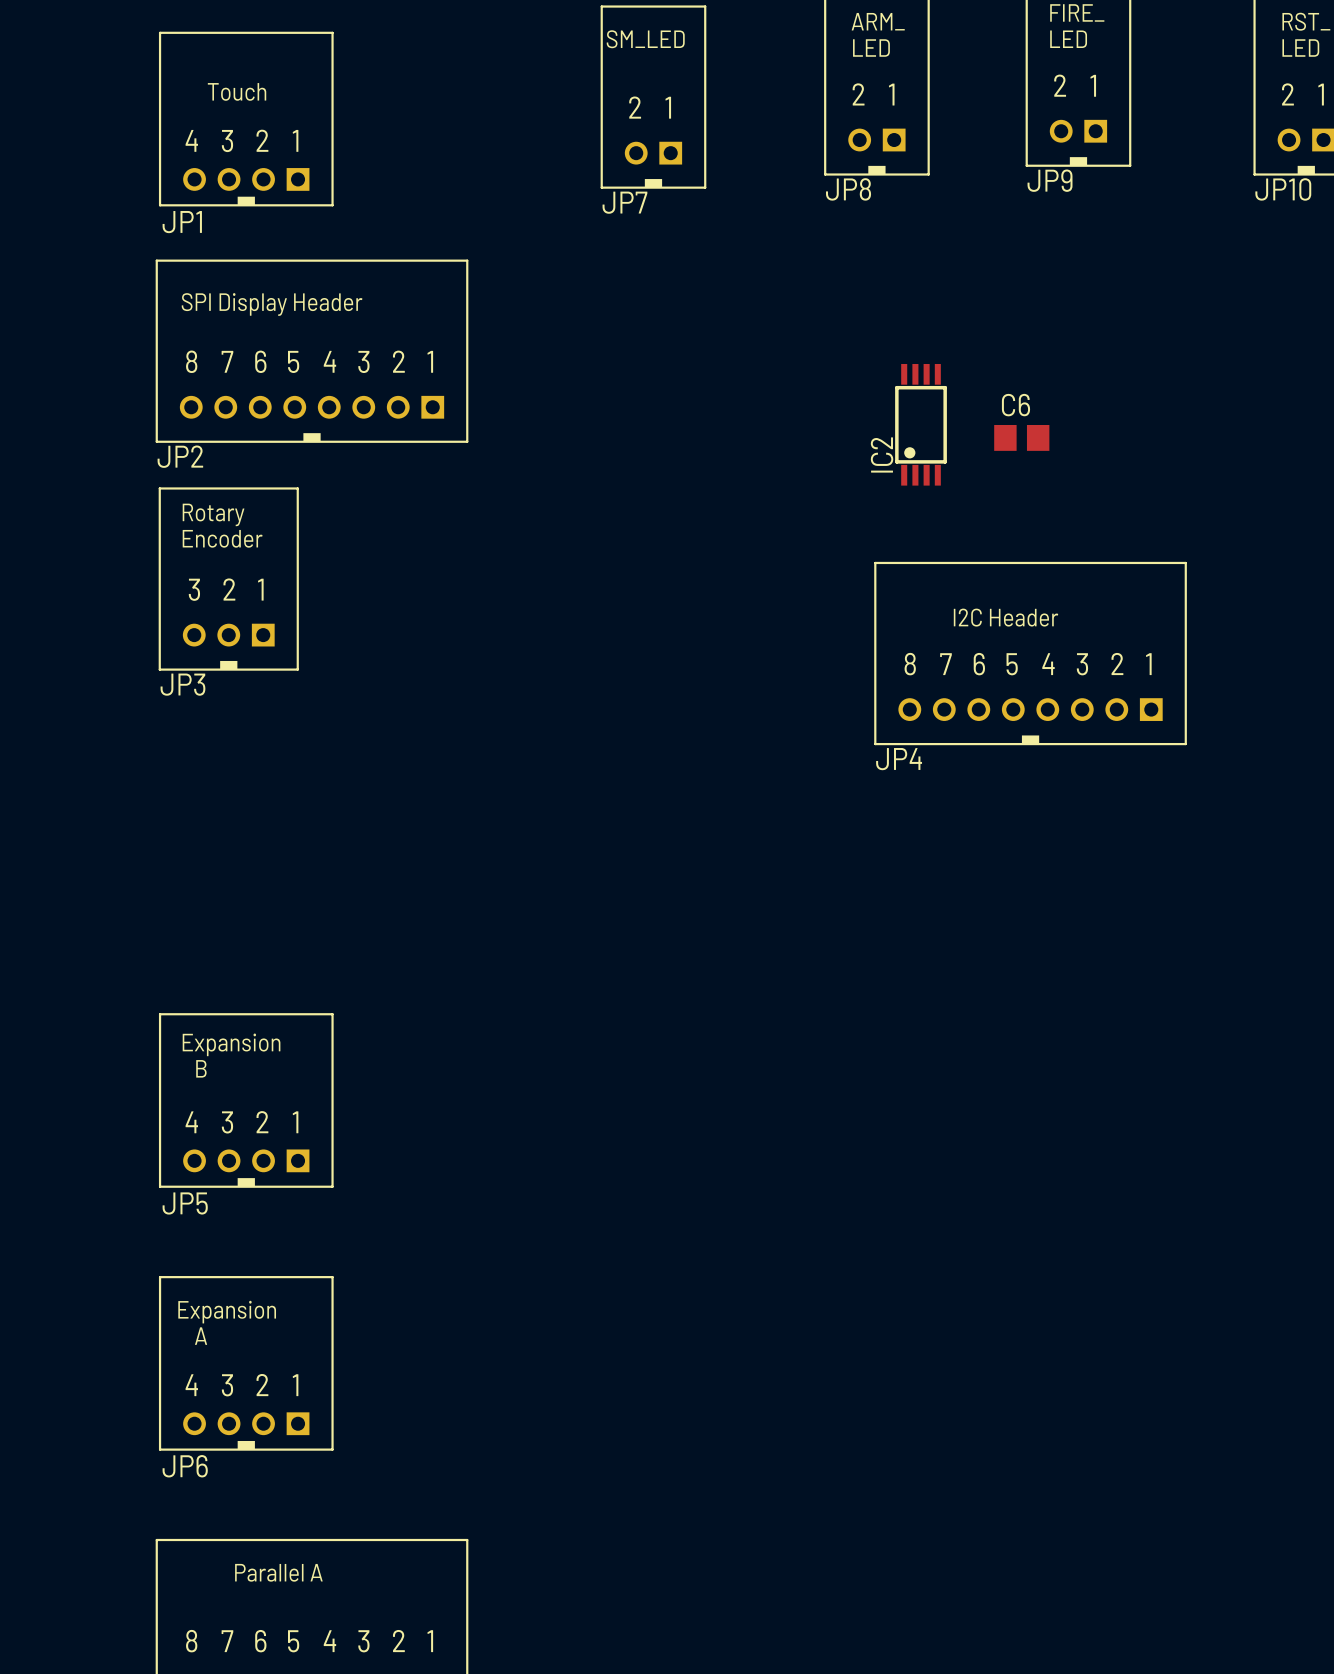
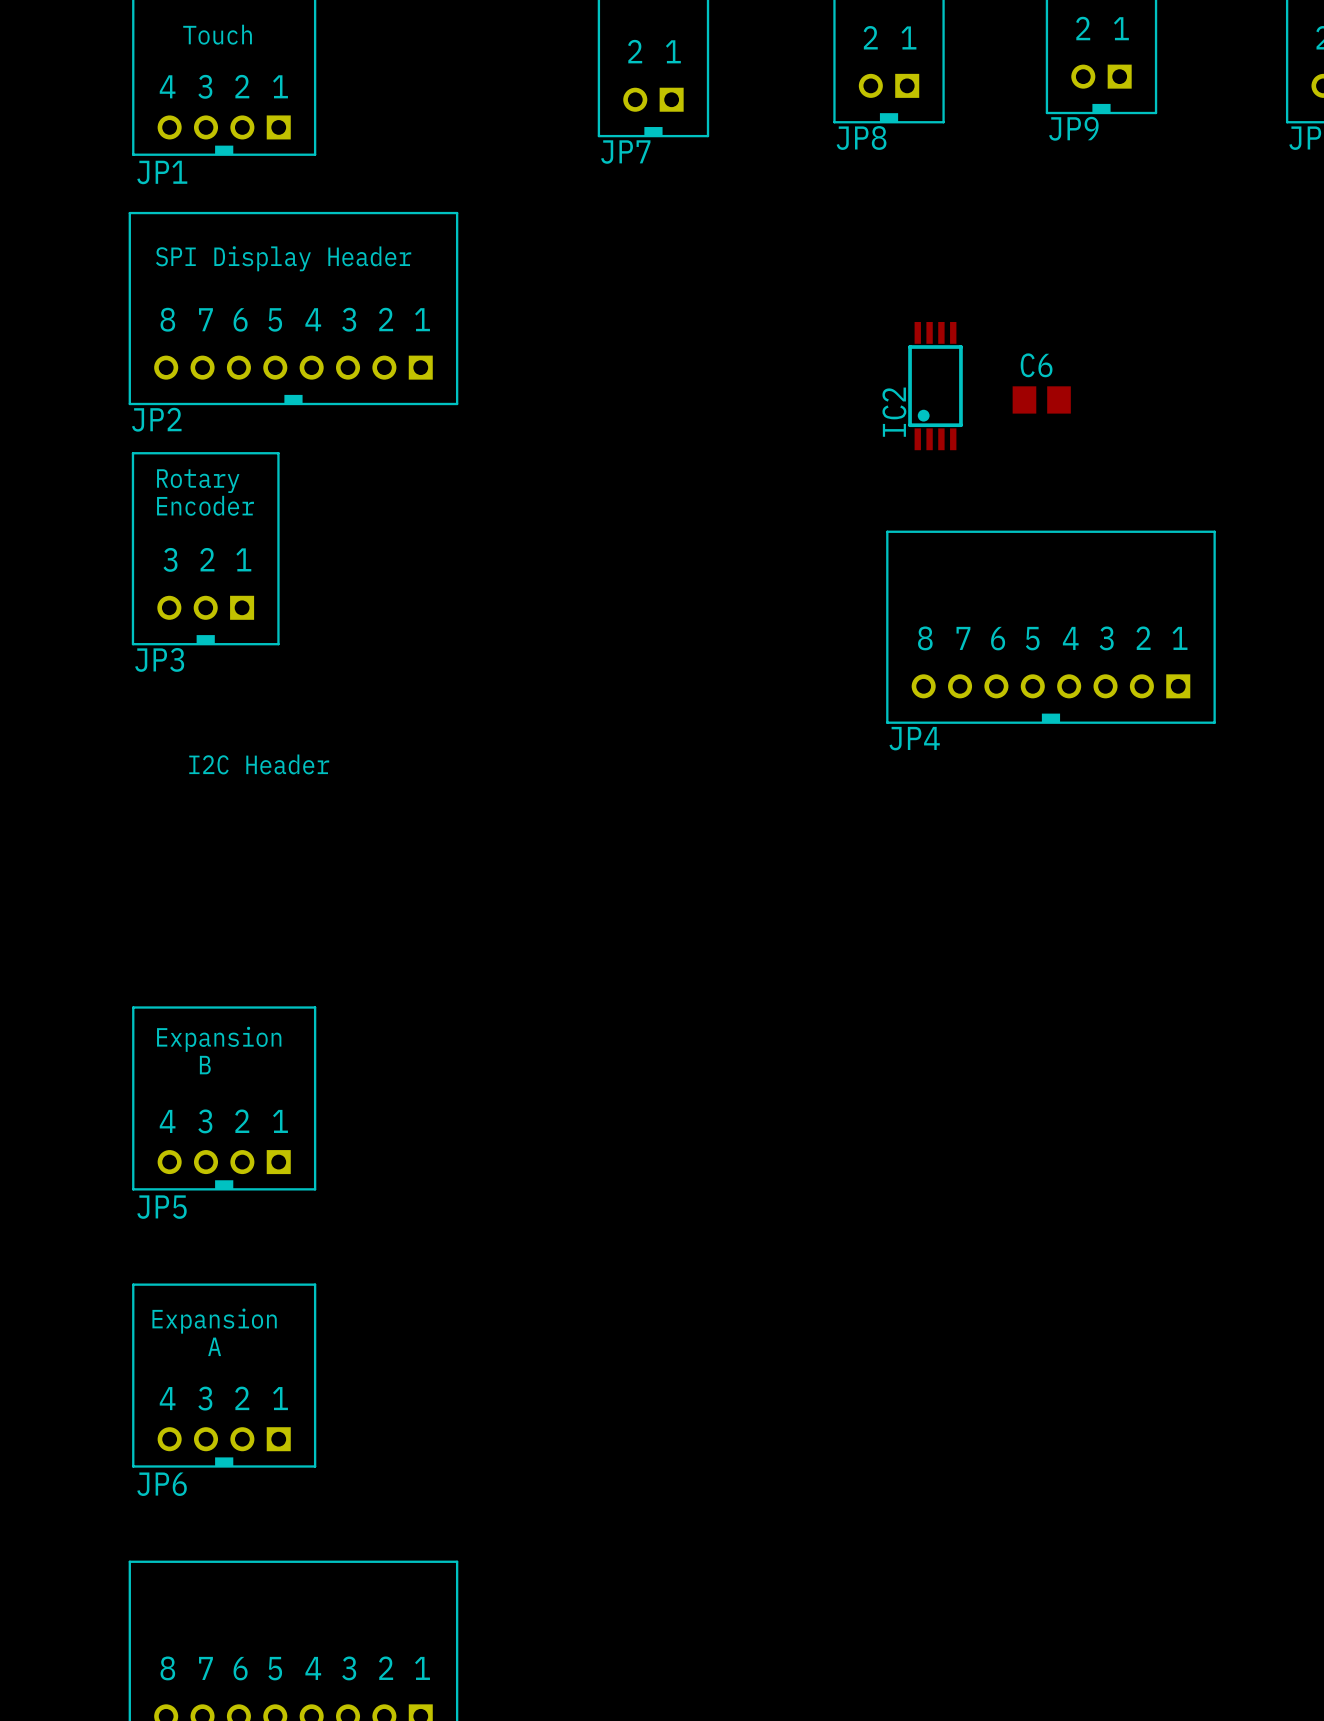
text: I2C Header (1006, 617) -> none
text: none -> I2C Header (259, 764)
text: Parallel A (278, 1572) -> none

